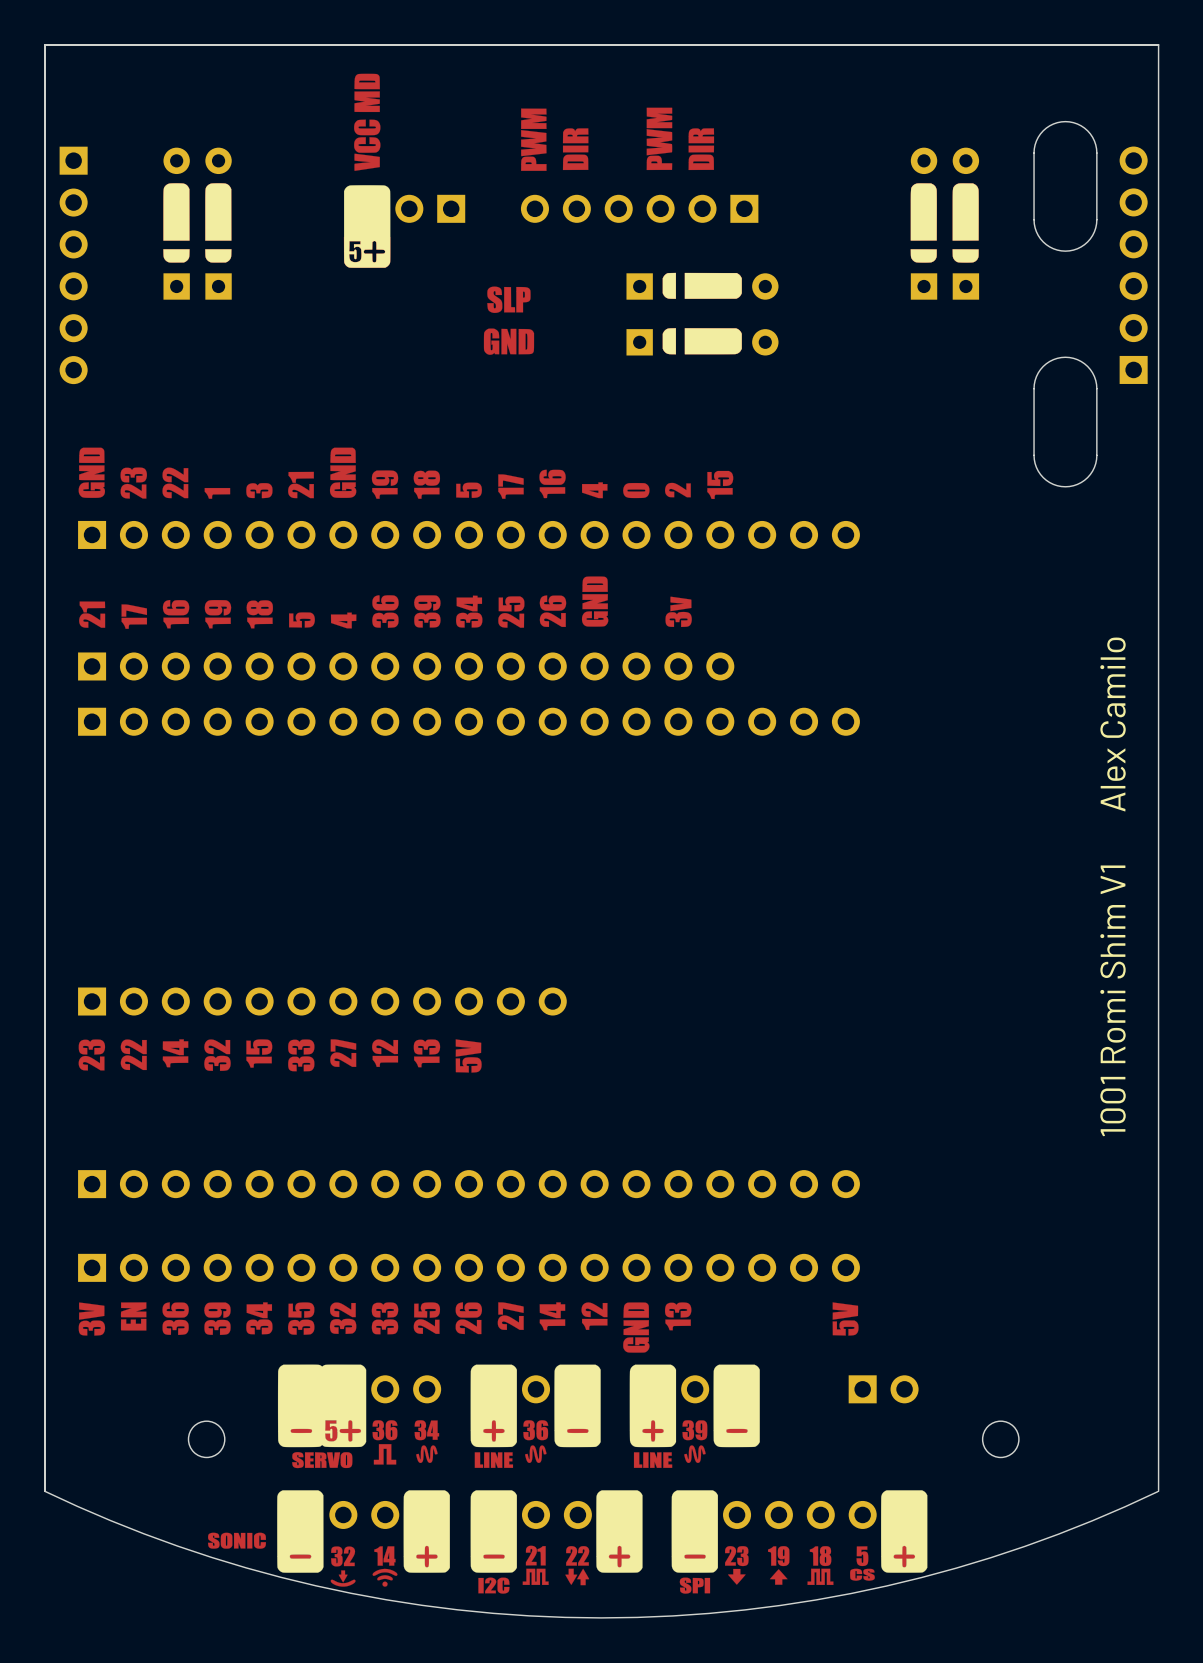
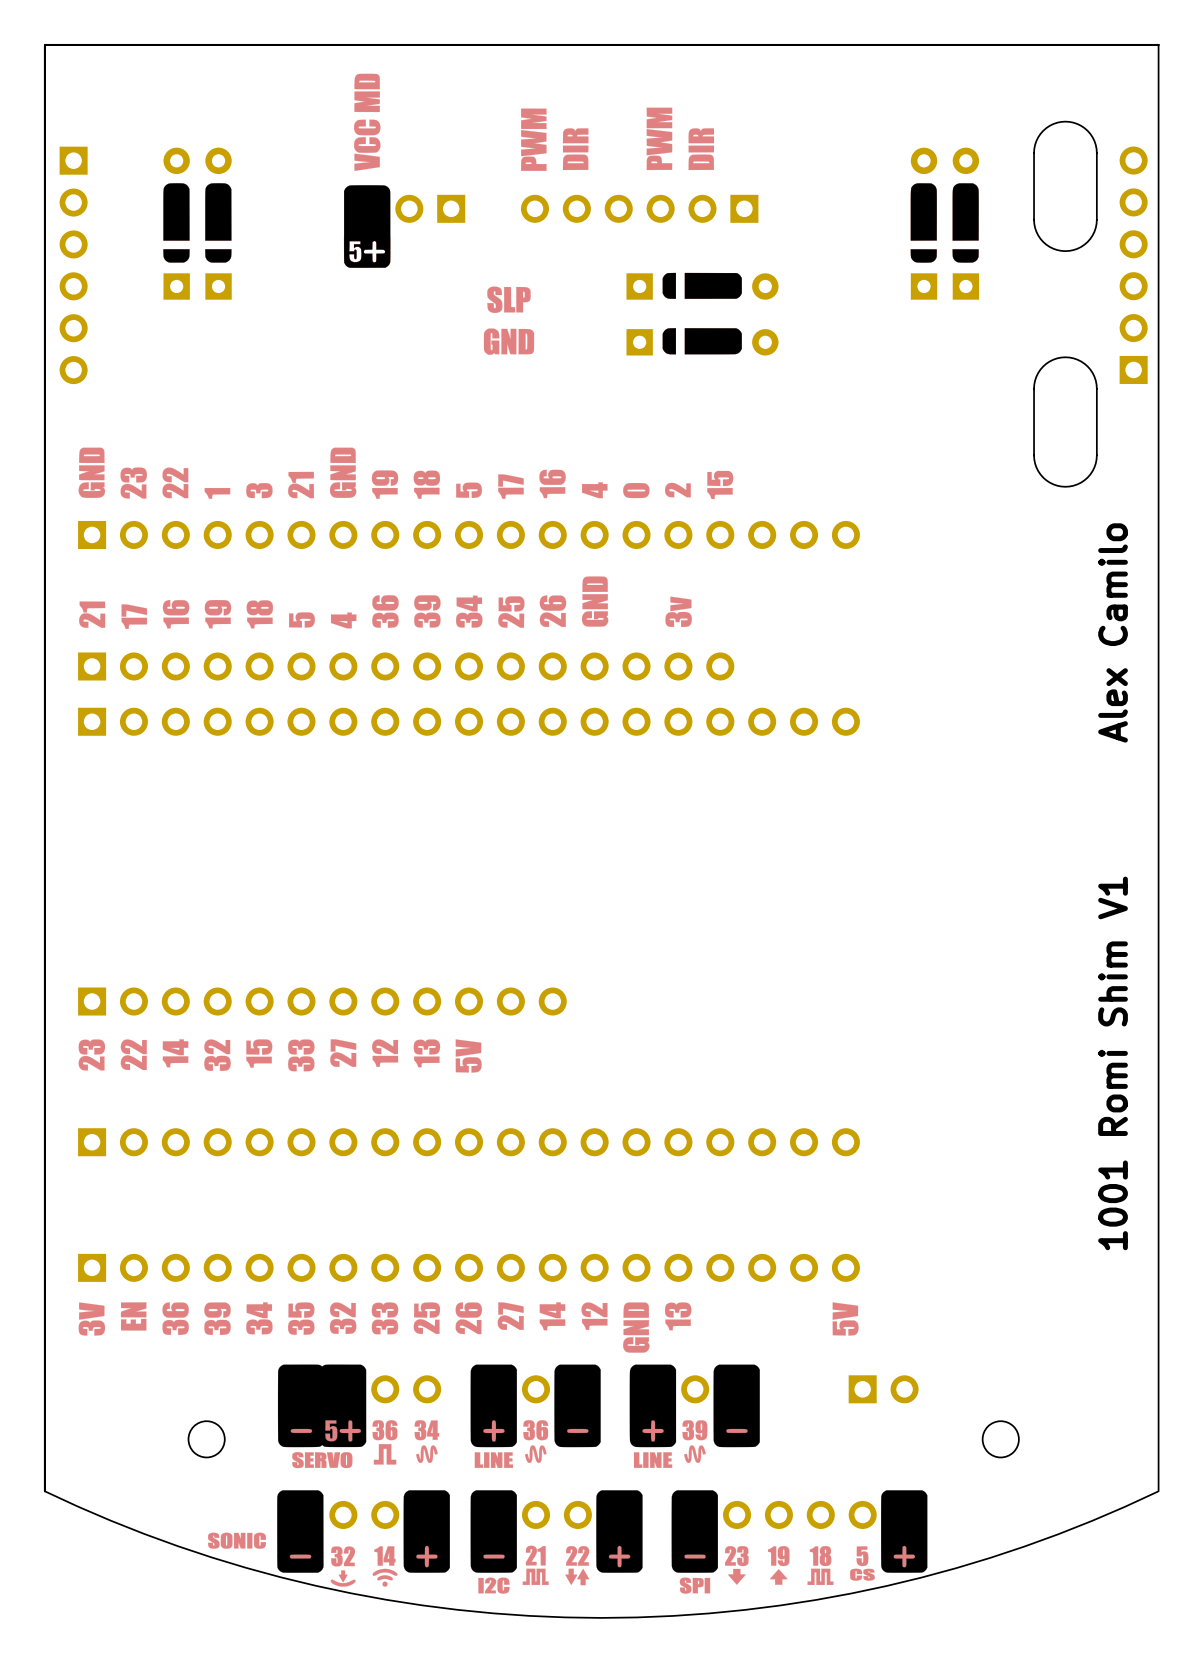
part position: (469, 1184) -> (469, 1142)

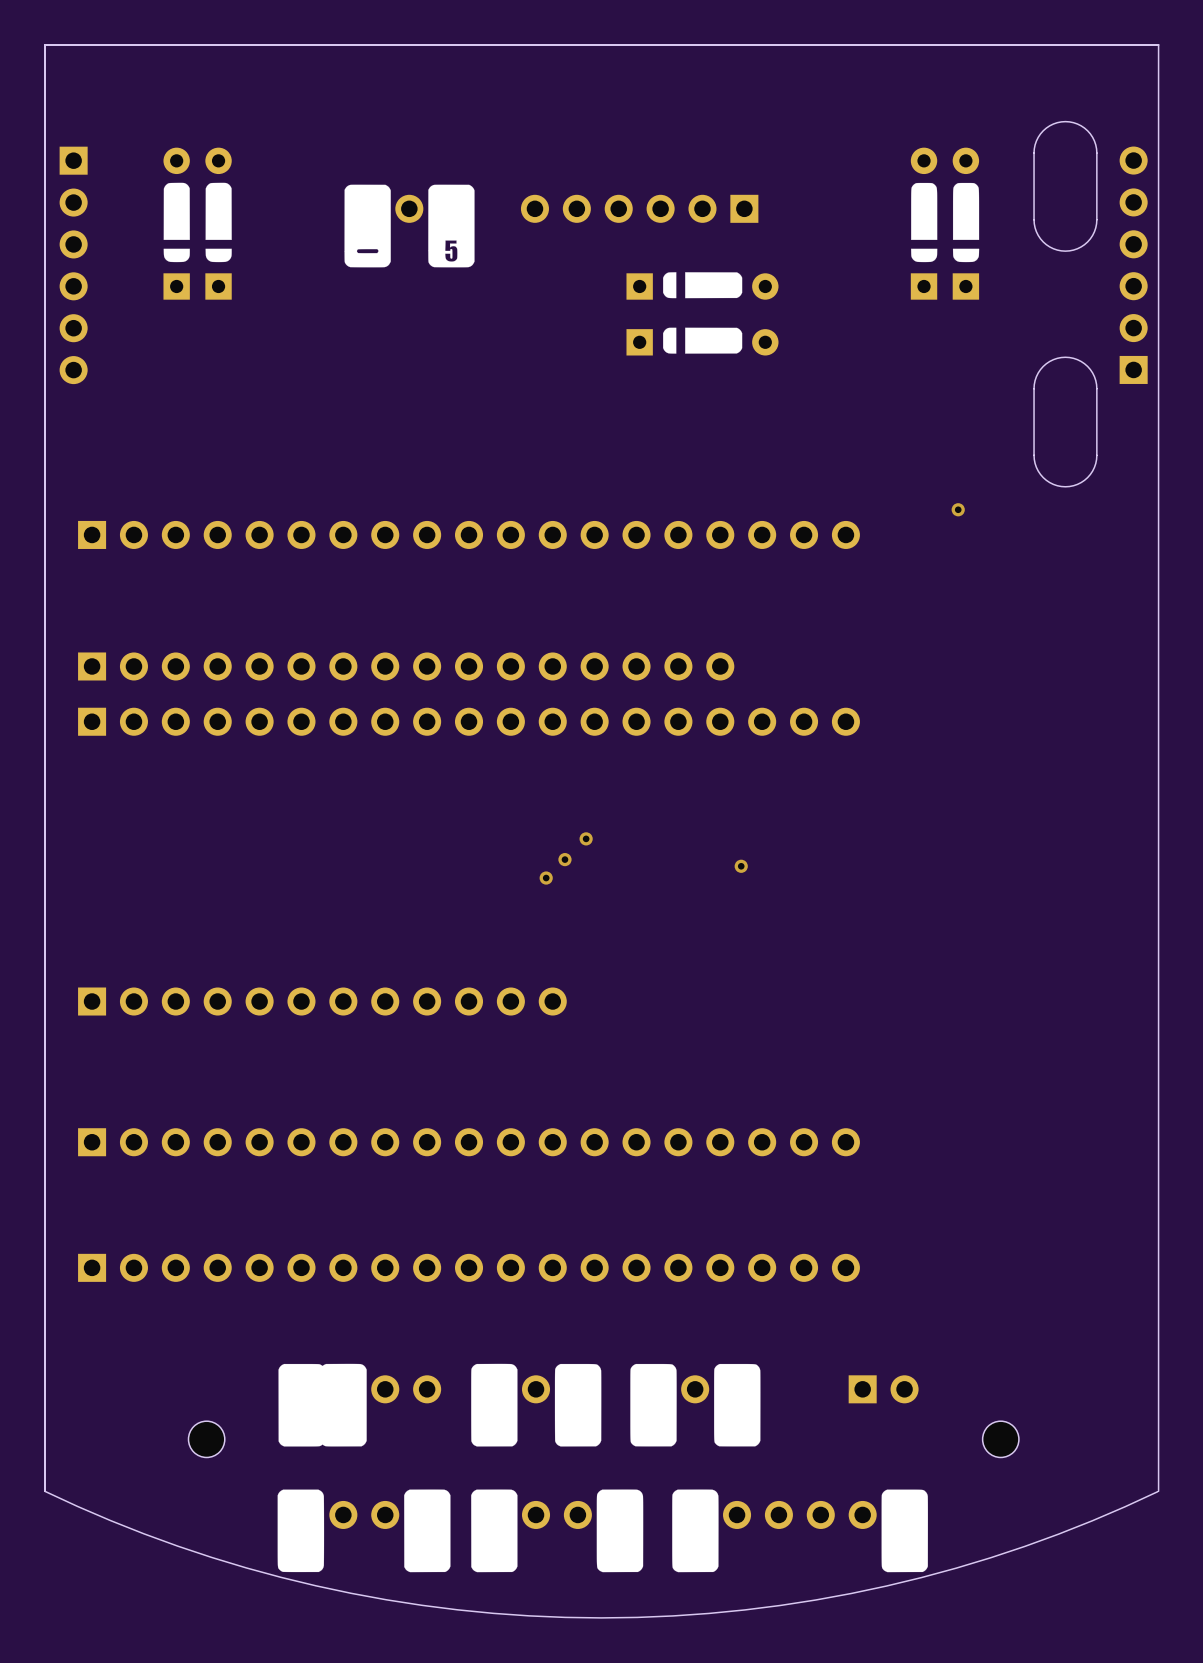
drawing: [78, 73, 979, 1594] -> none
drawing: none -> [163, 182, 980, 1573]
via: none -> (958, 509)
via: none -> (586, 838)
via: none -> (564, 859)
via: none -> (741, 866)
via: none -> (546, 878)
text: 1001 Romi Shim V1 Alex Camilo (1113, 886) -> none

